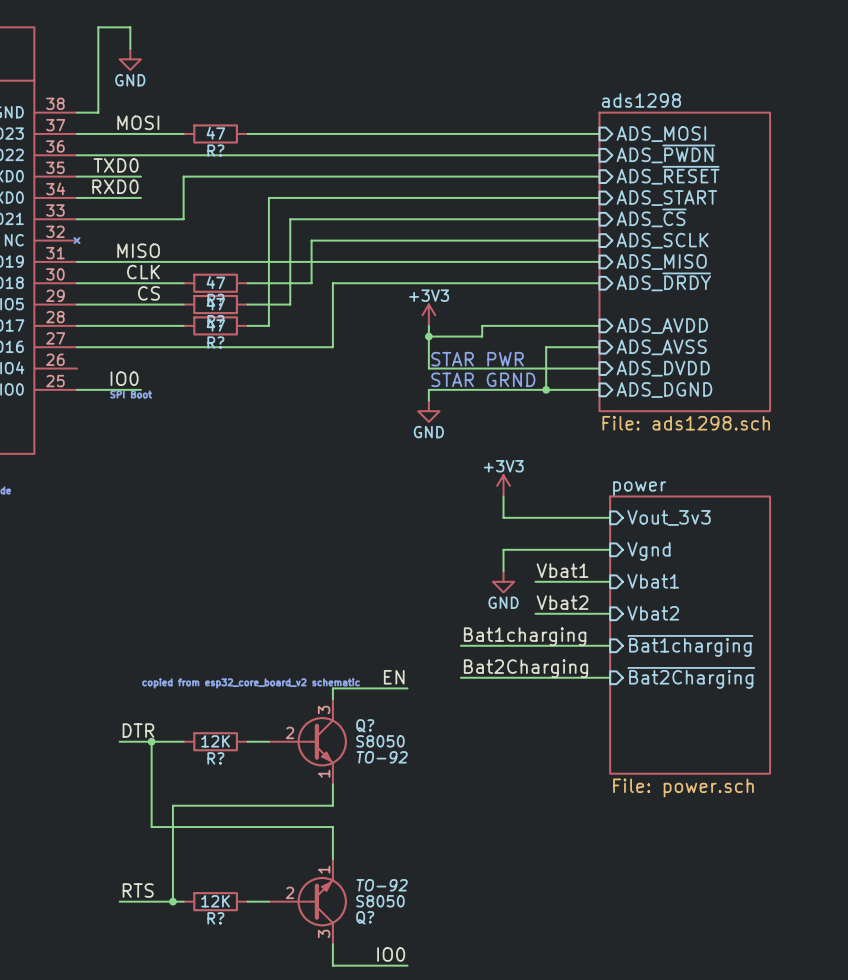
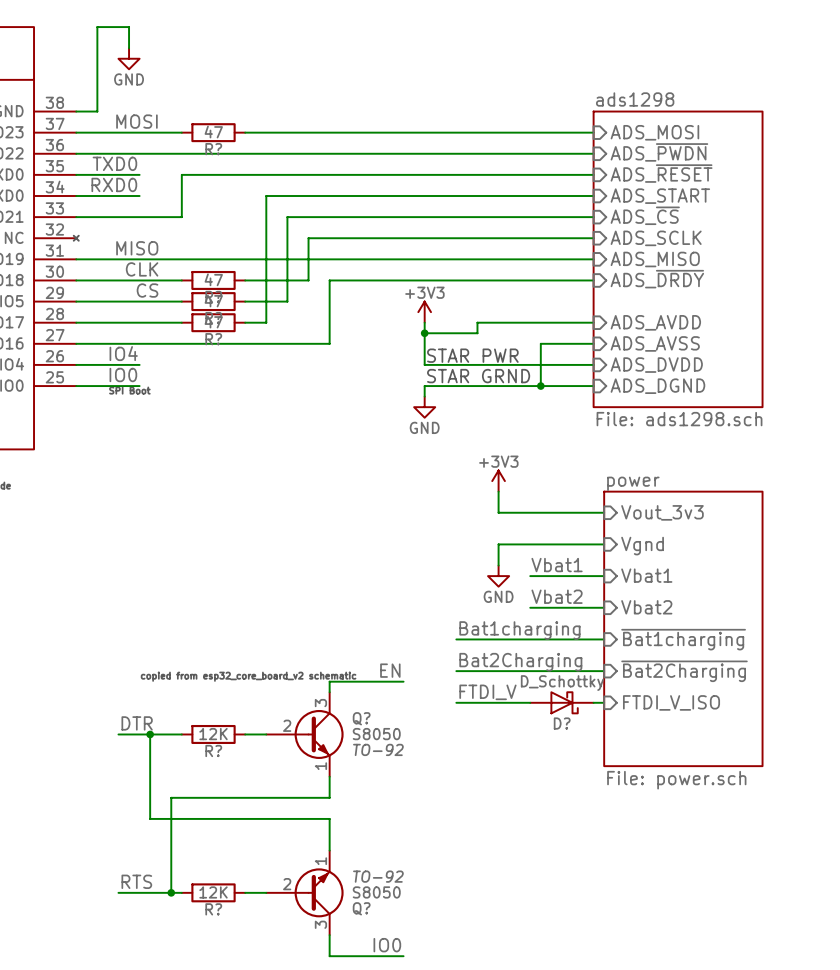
label: none -> IO4 (123, 353)
wire: none -> (76, 364) (139, 364)
label: none -> FTDI_V (487, 692)
wire: none -> (456, 702) (530, 702)
D?: none -> D_Schottky (561, 702)
wire: none -> (593, 702) (604, 702)
sheet pin: none -> FTDI_V_ISO (671, 702)

